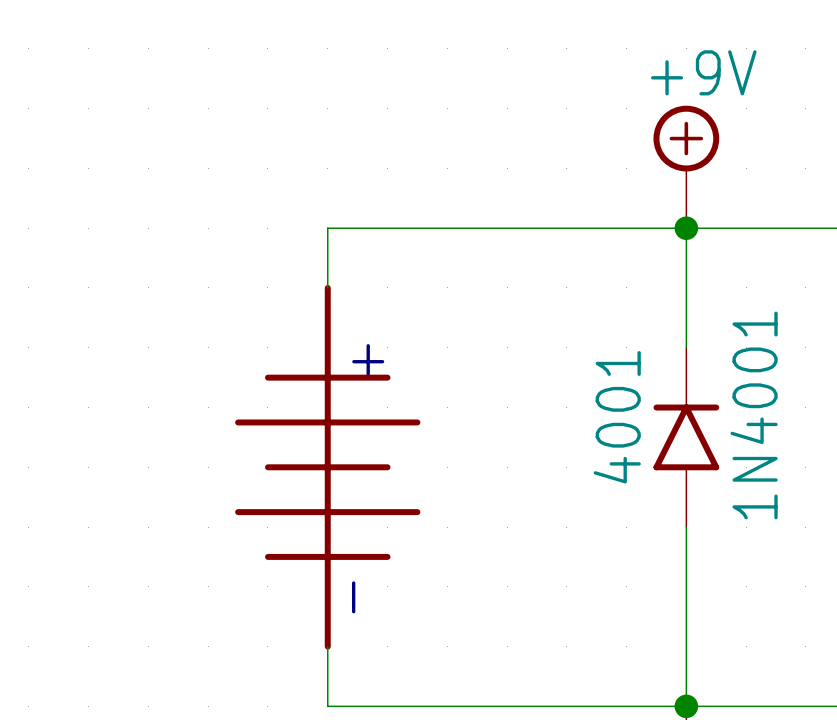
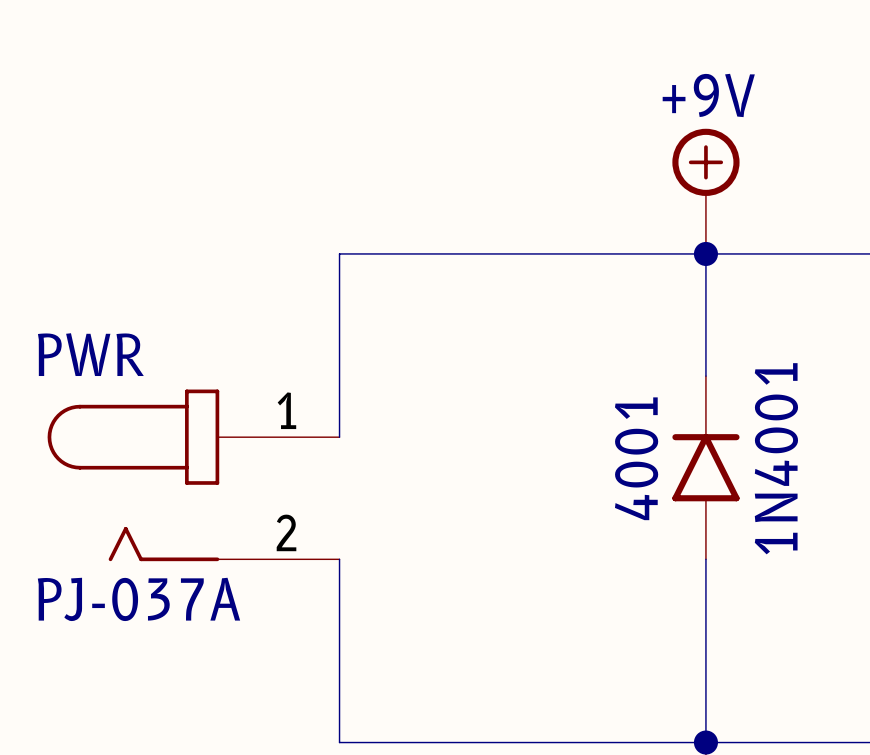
PWR: none -> PJ-037A (193, 475)
part: (327, 467) -> none

